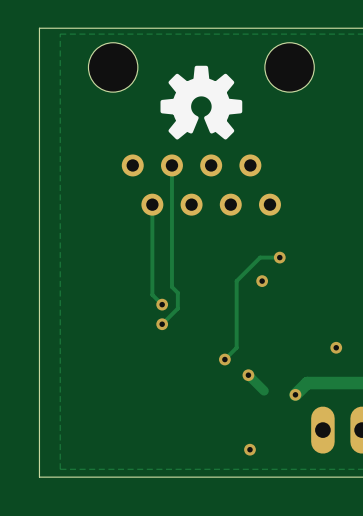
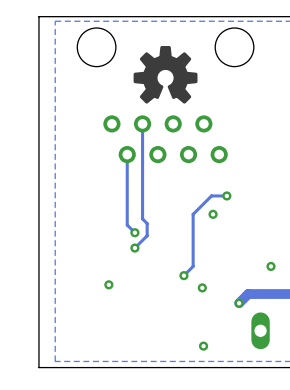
via: none -> (108, 284)
track: (248, 375) (264, 390) -> none

